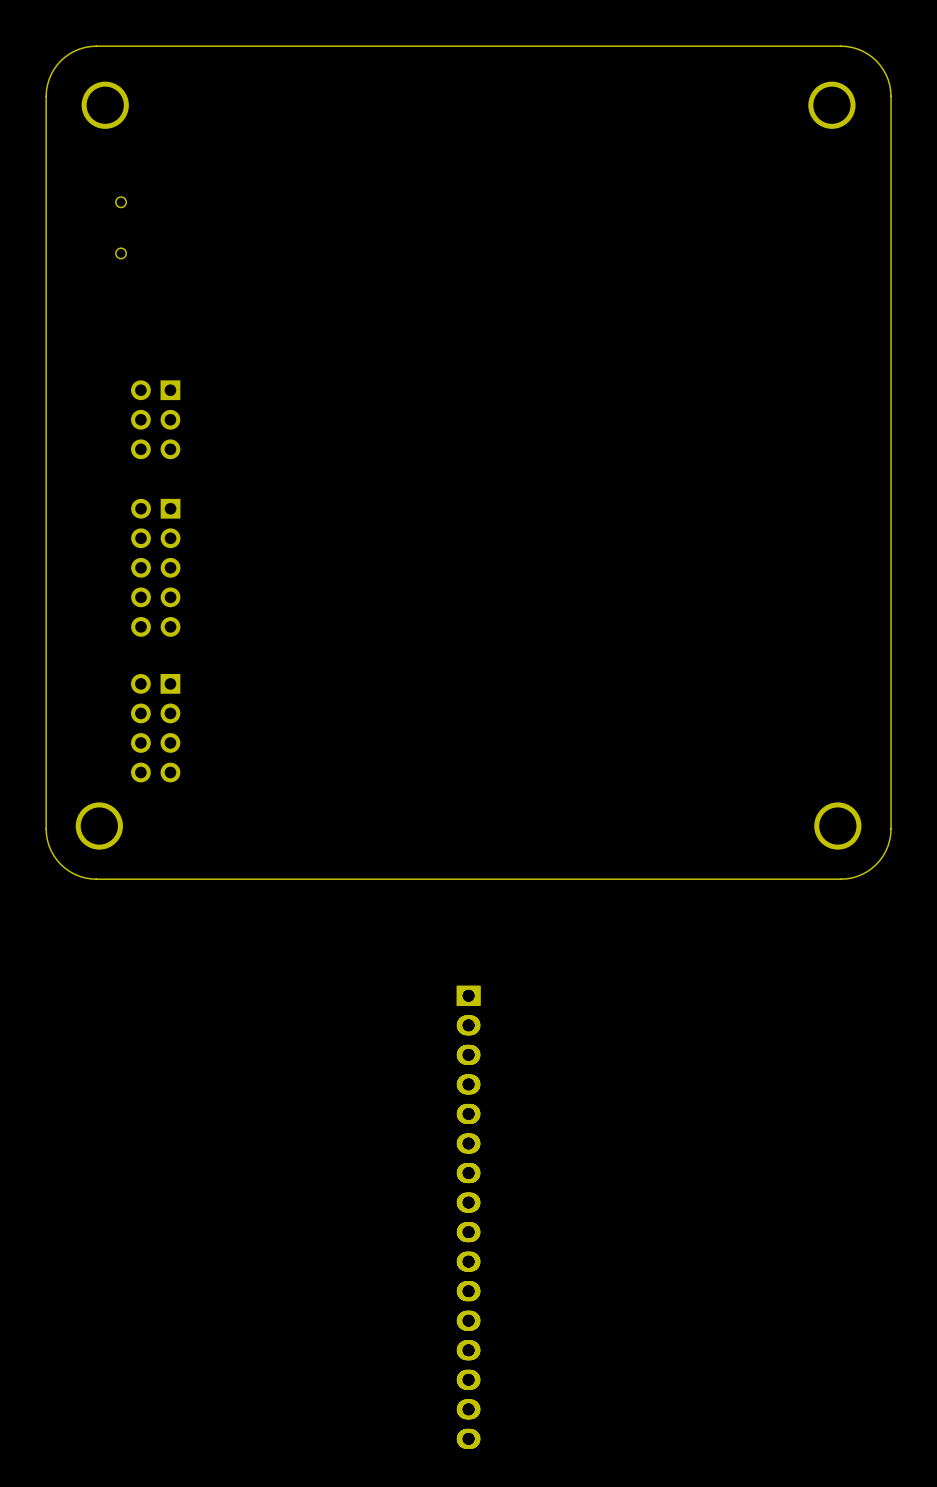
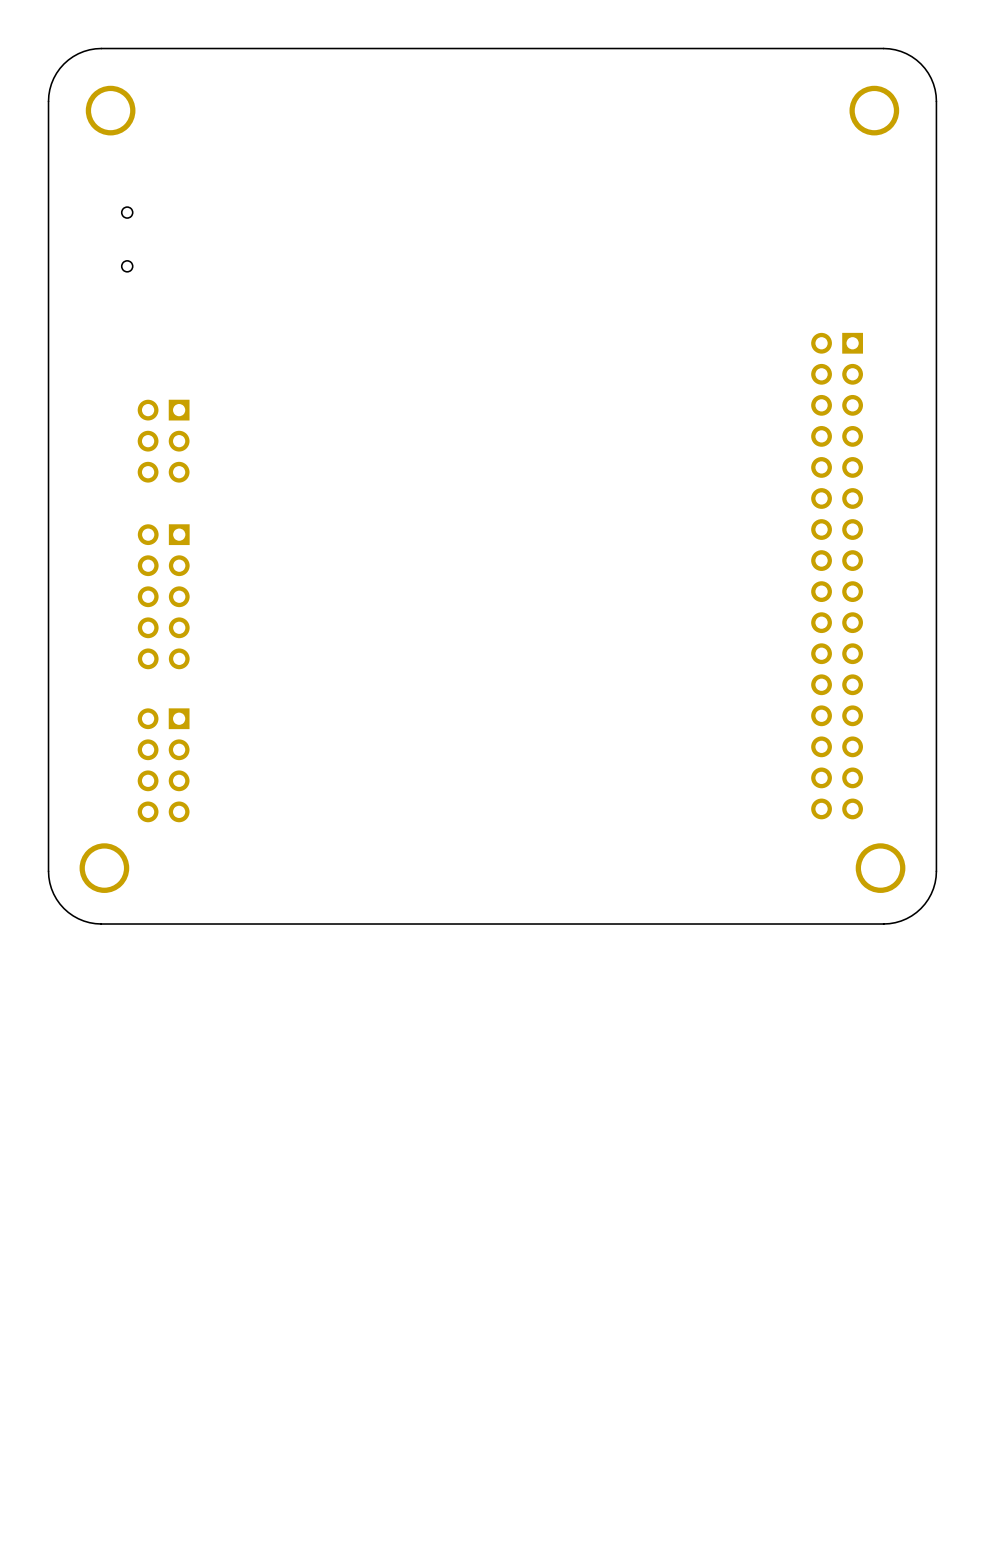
part: none -> (837, 576)
part: (468, 1217) -> none

